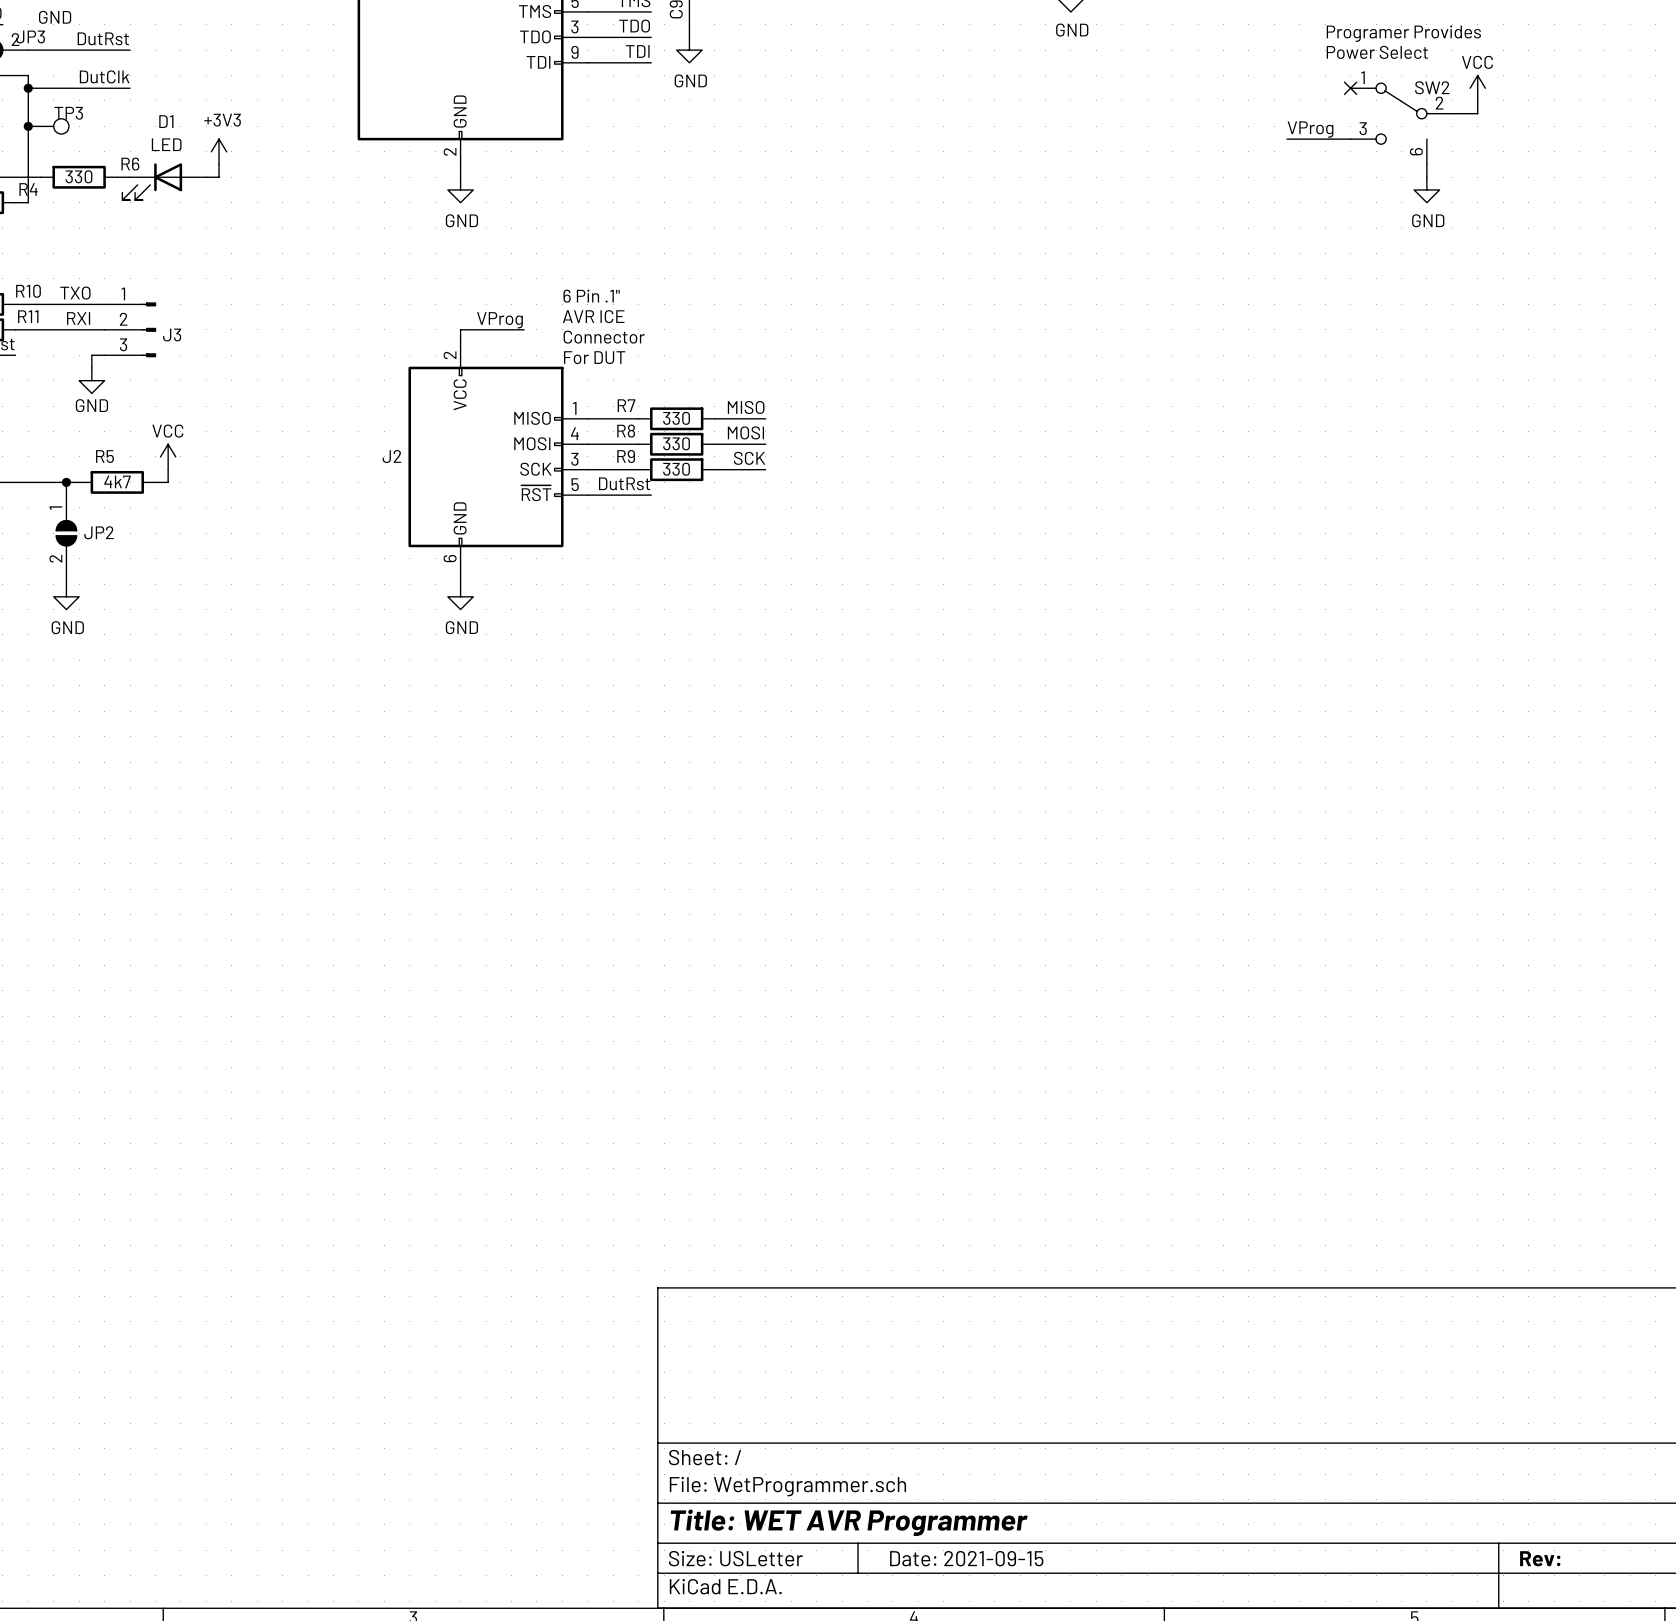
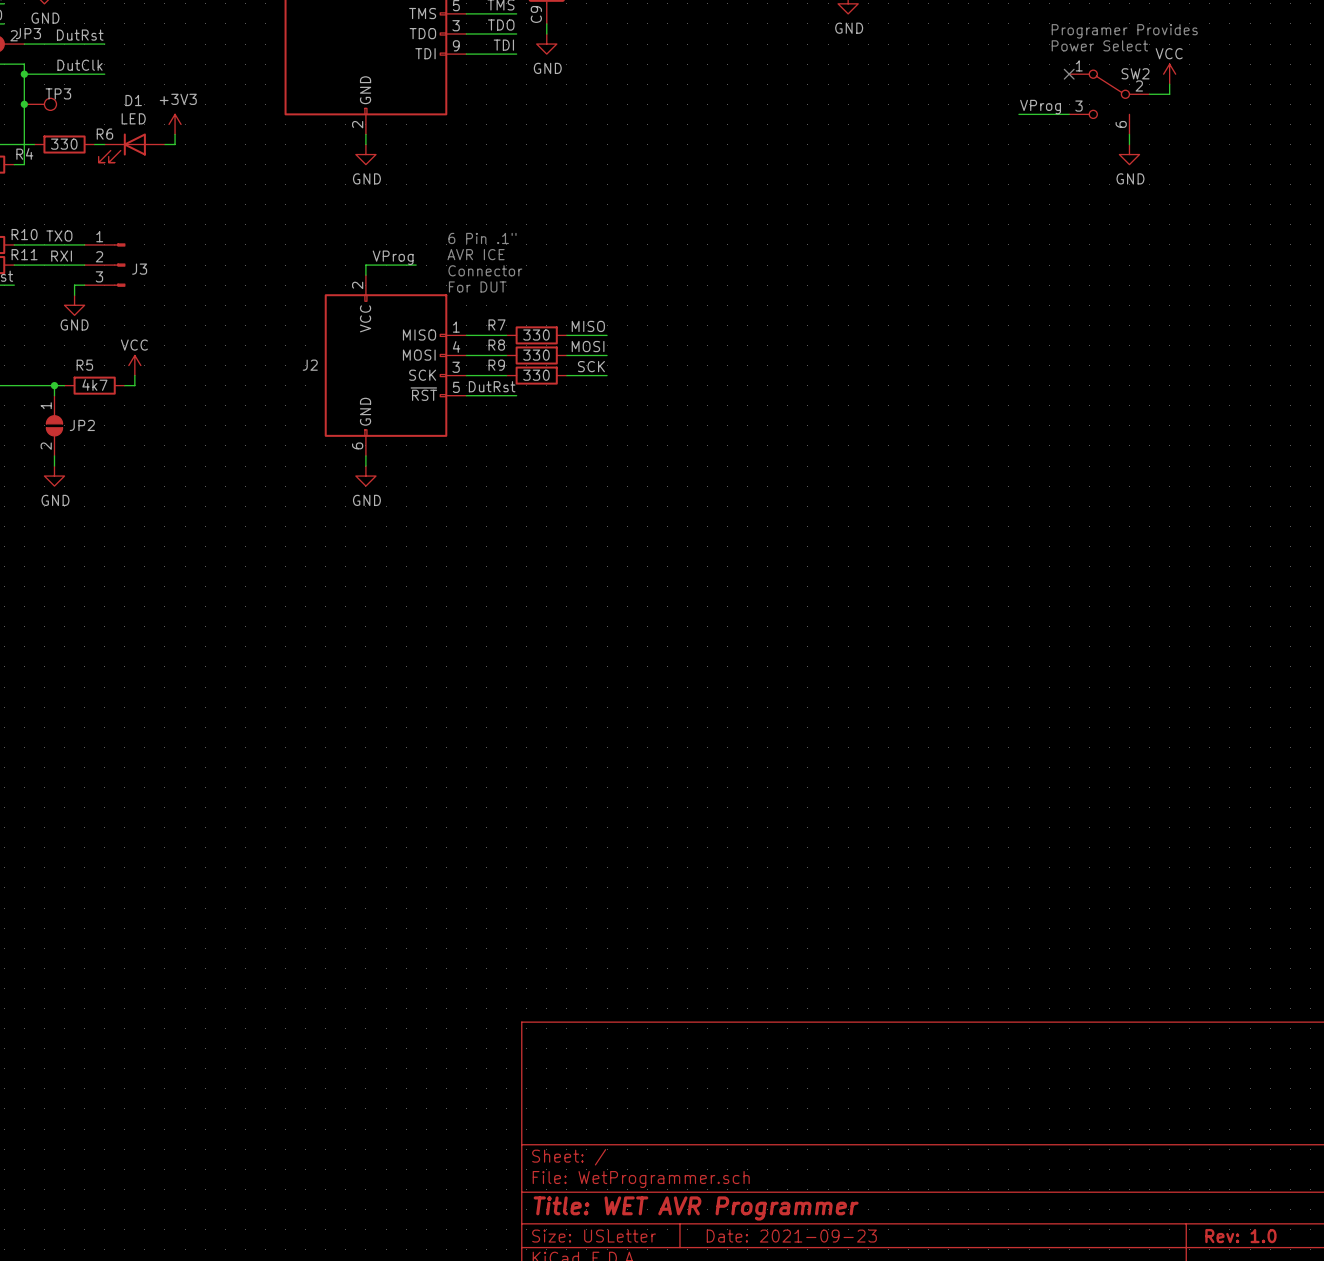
title block: Date: 2021-09-15 (966, 1558) -> Date: 2021-09-23 (791, 1236)
title block: Rev: (1540, 1558) -> Rev: 1.0 (1240, 1236)

